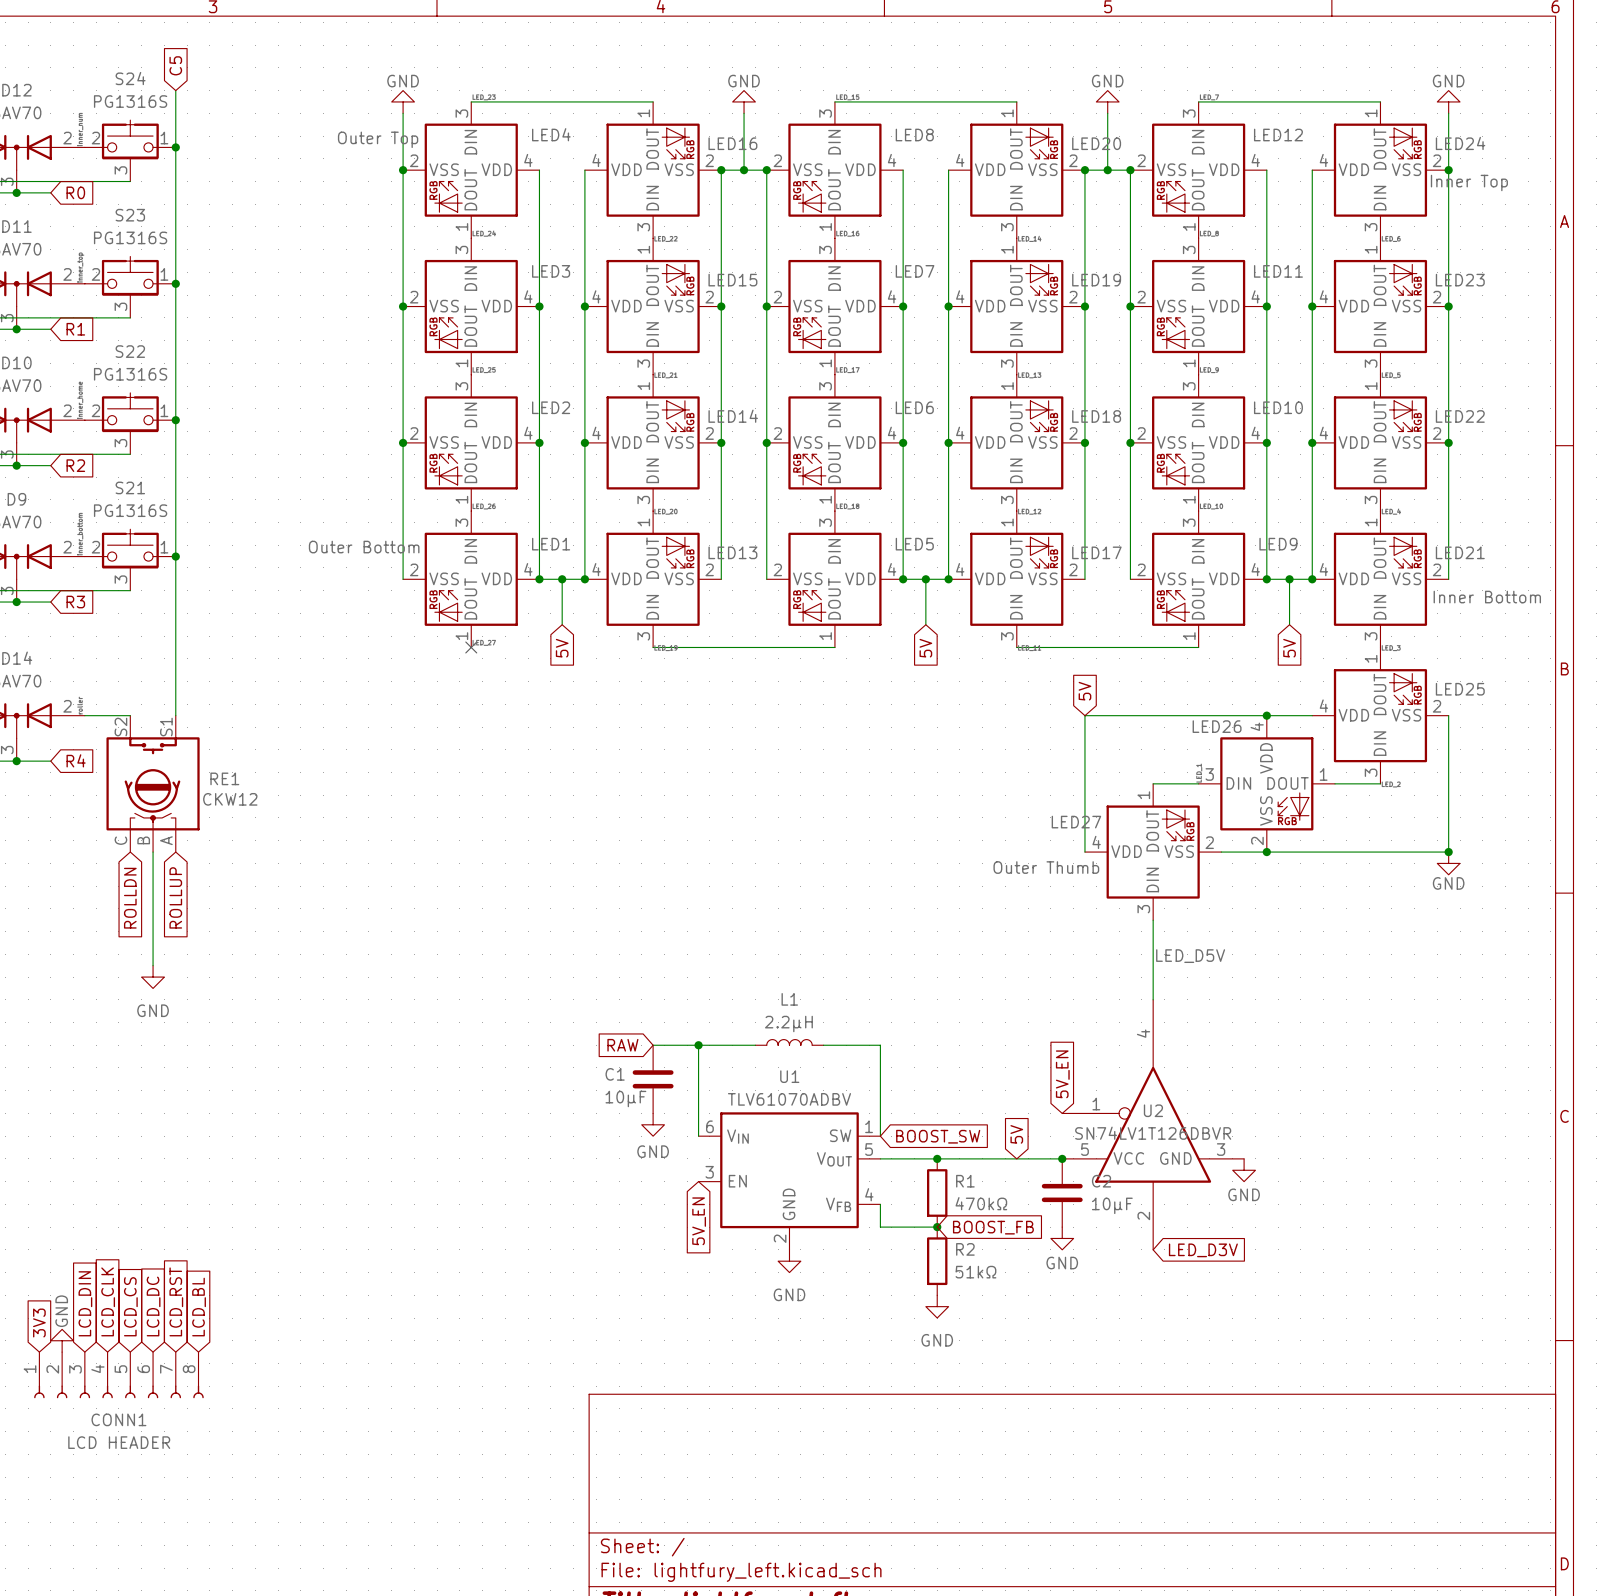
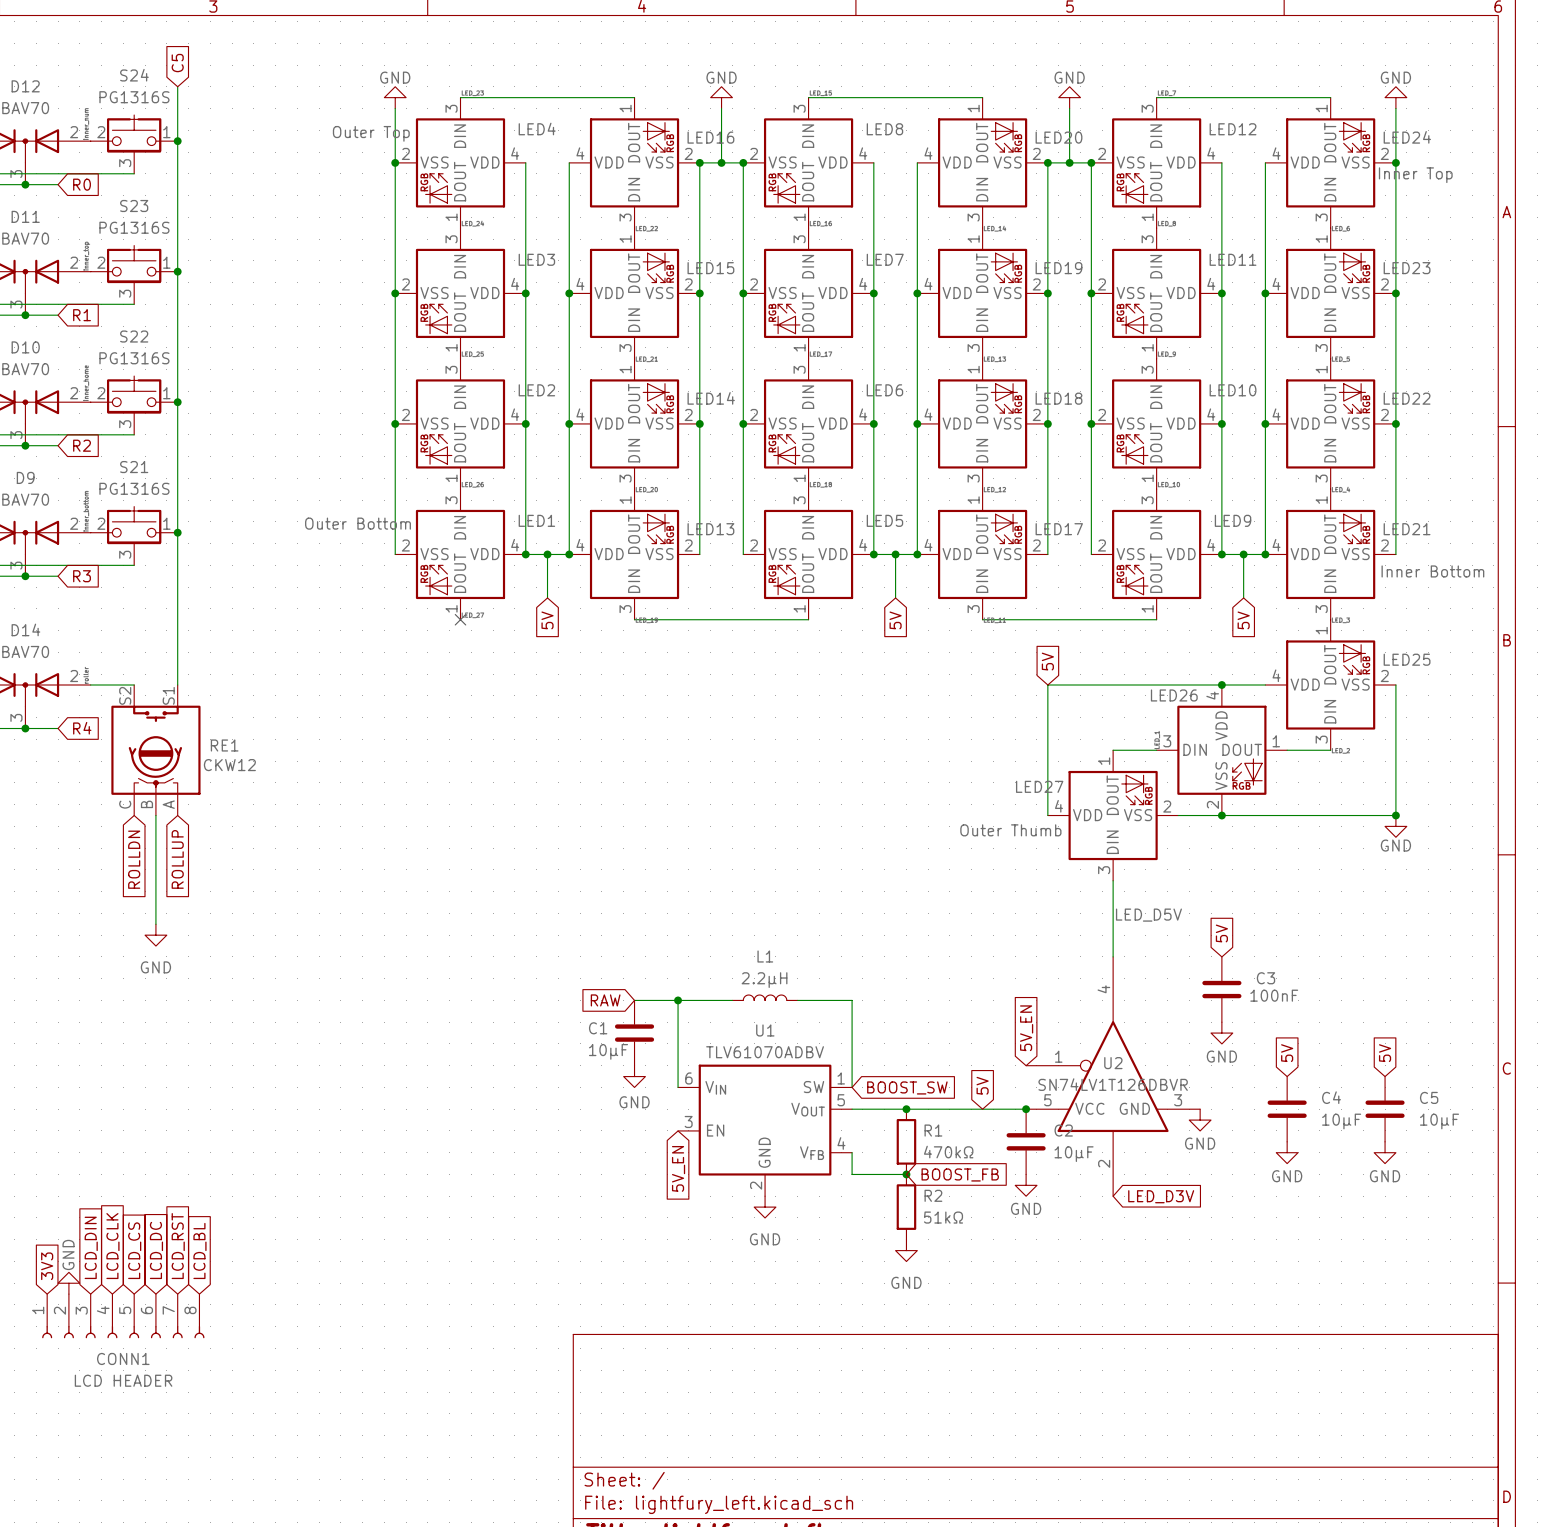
global label: none -> 5V (1221, 933)
C3: none -> 100nF (1221, 989)
power symbol: none -> GND (1221, 1033)
global label: none -> 5V (1287, 1053)
global label: none -> 5V (1385, 1053)
C4: none -> 10µF (1287, 1109)
C5: none -> 10µF (1385, 1109)
power symbol: none -> GND (1287, 1152)
power symbol: none -> GND (1385, 1152)

